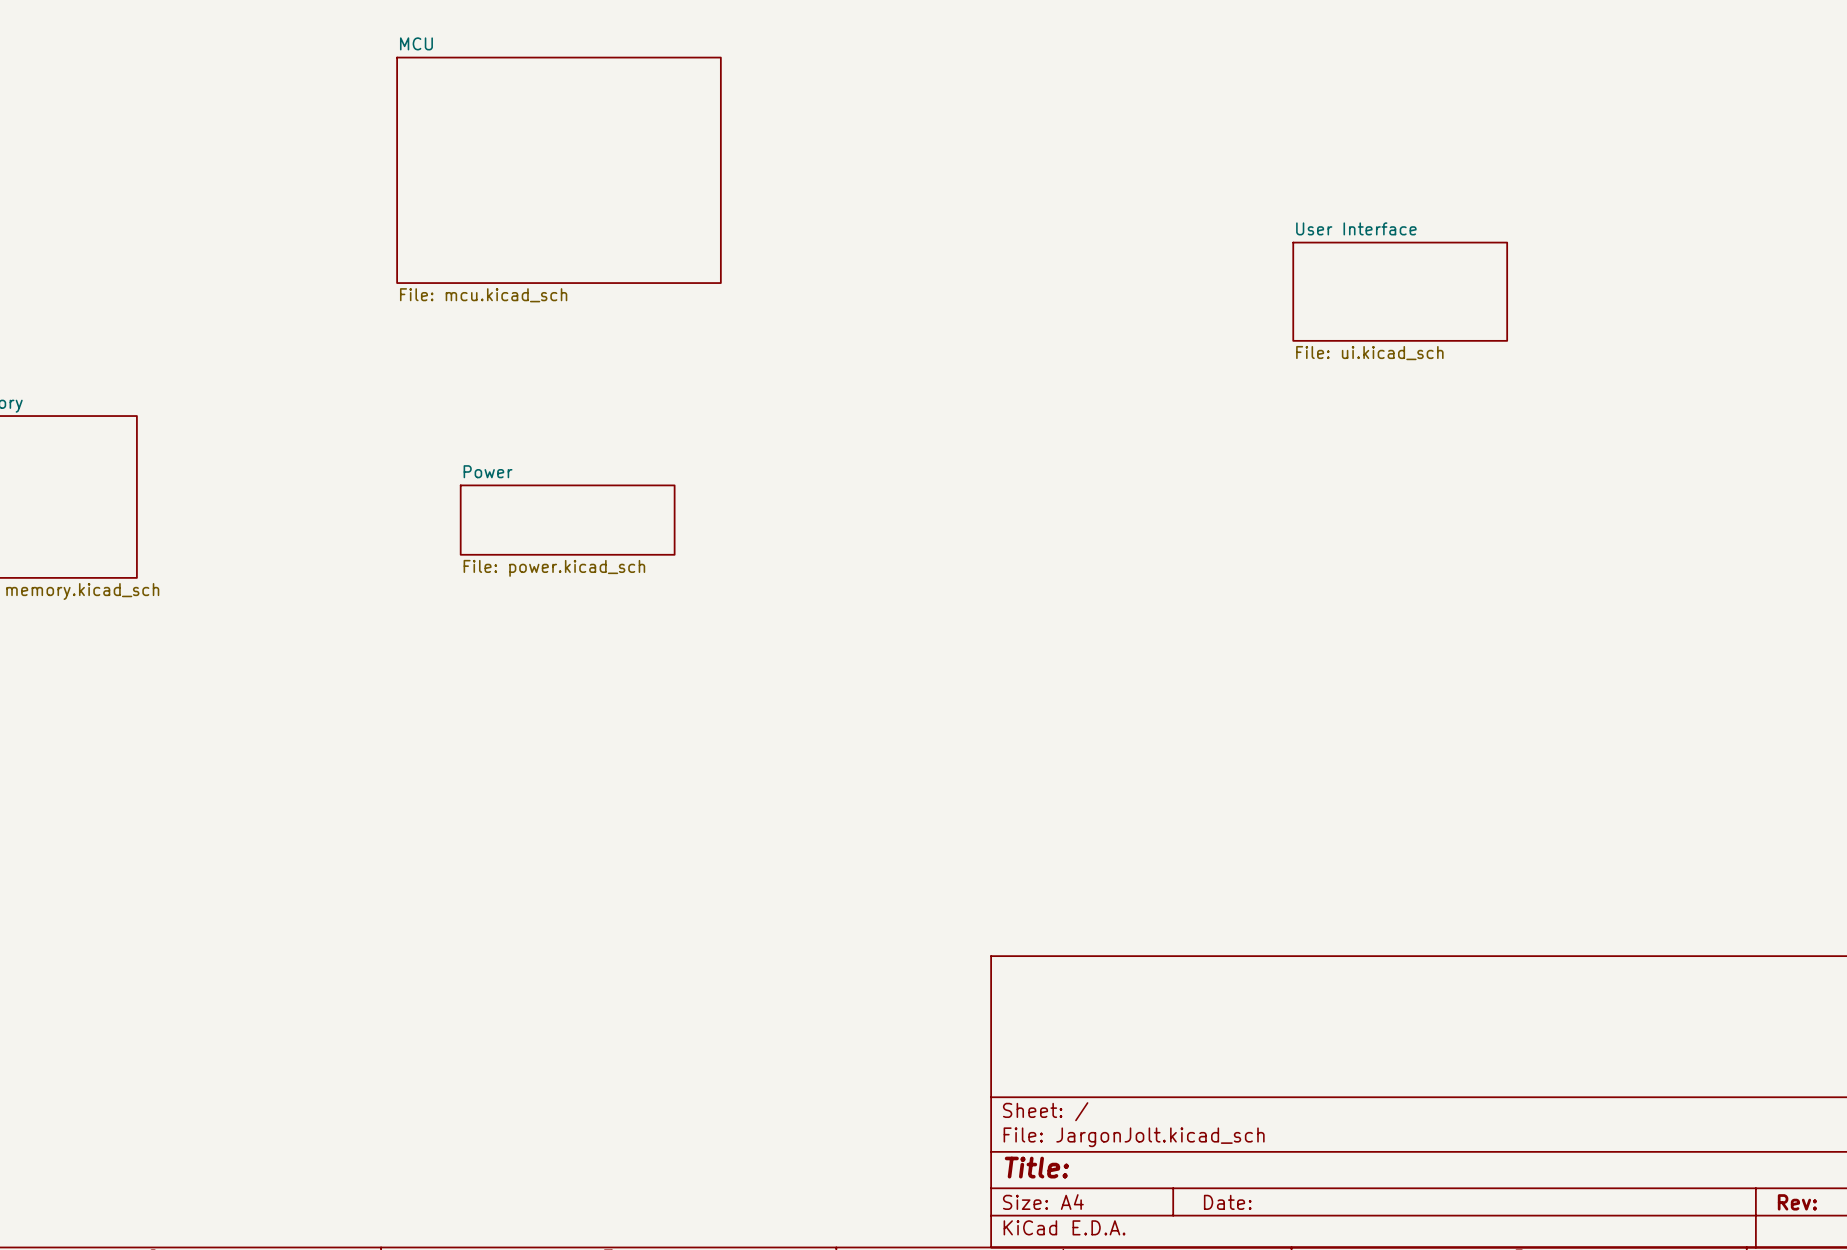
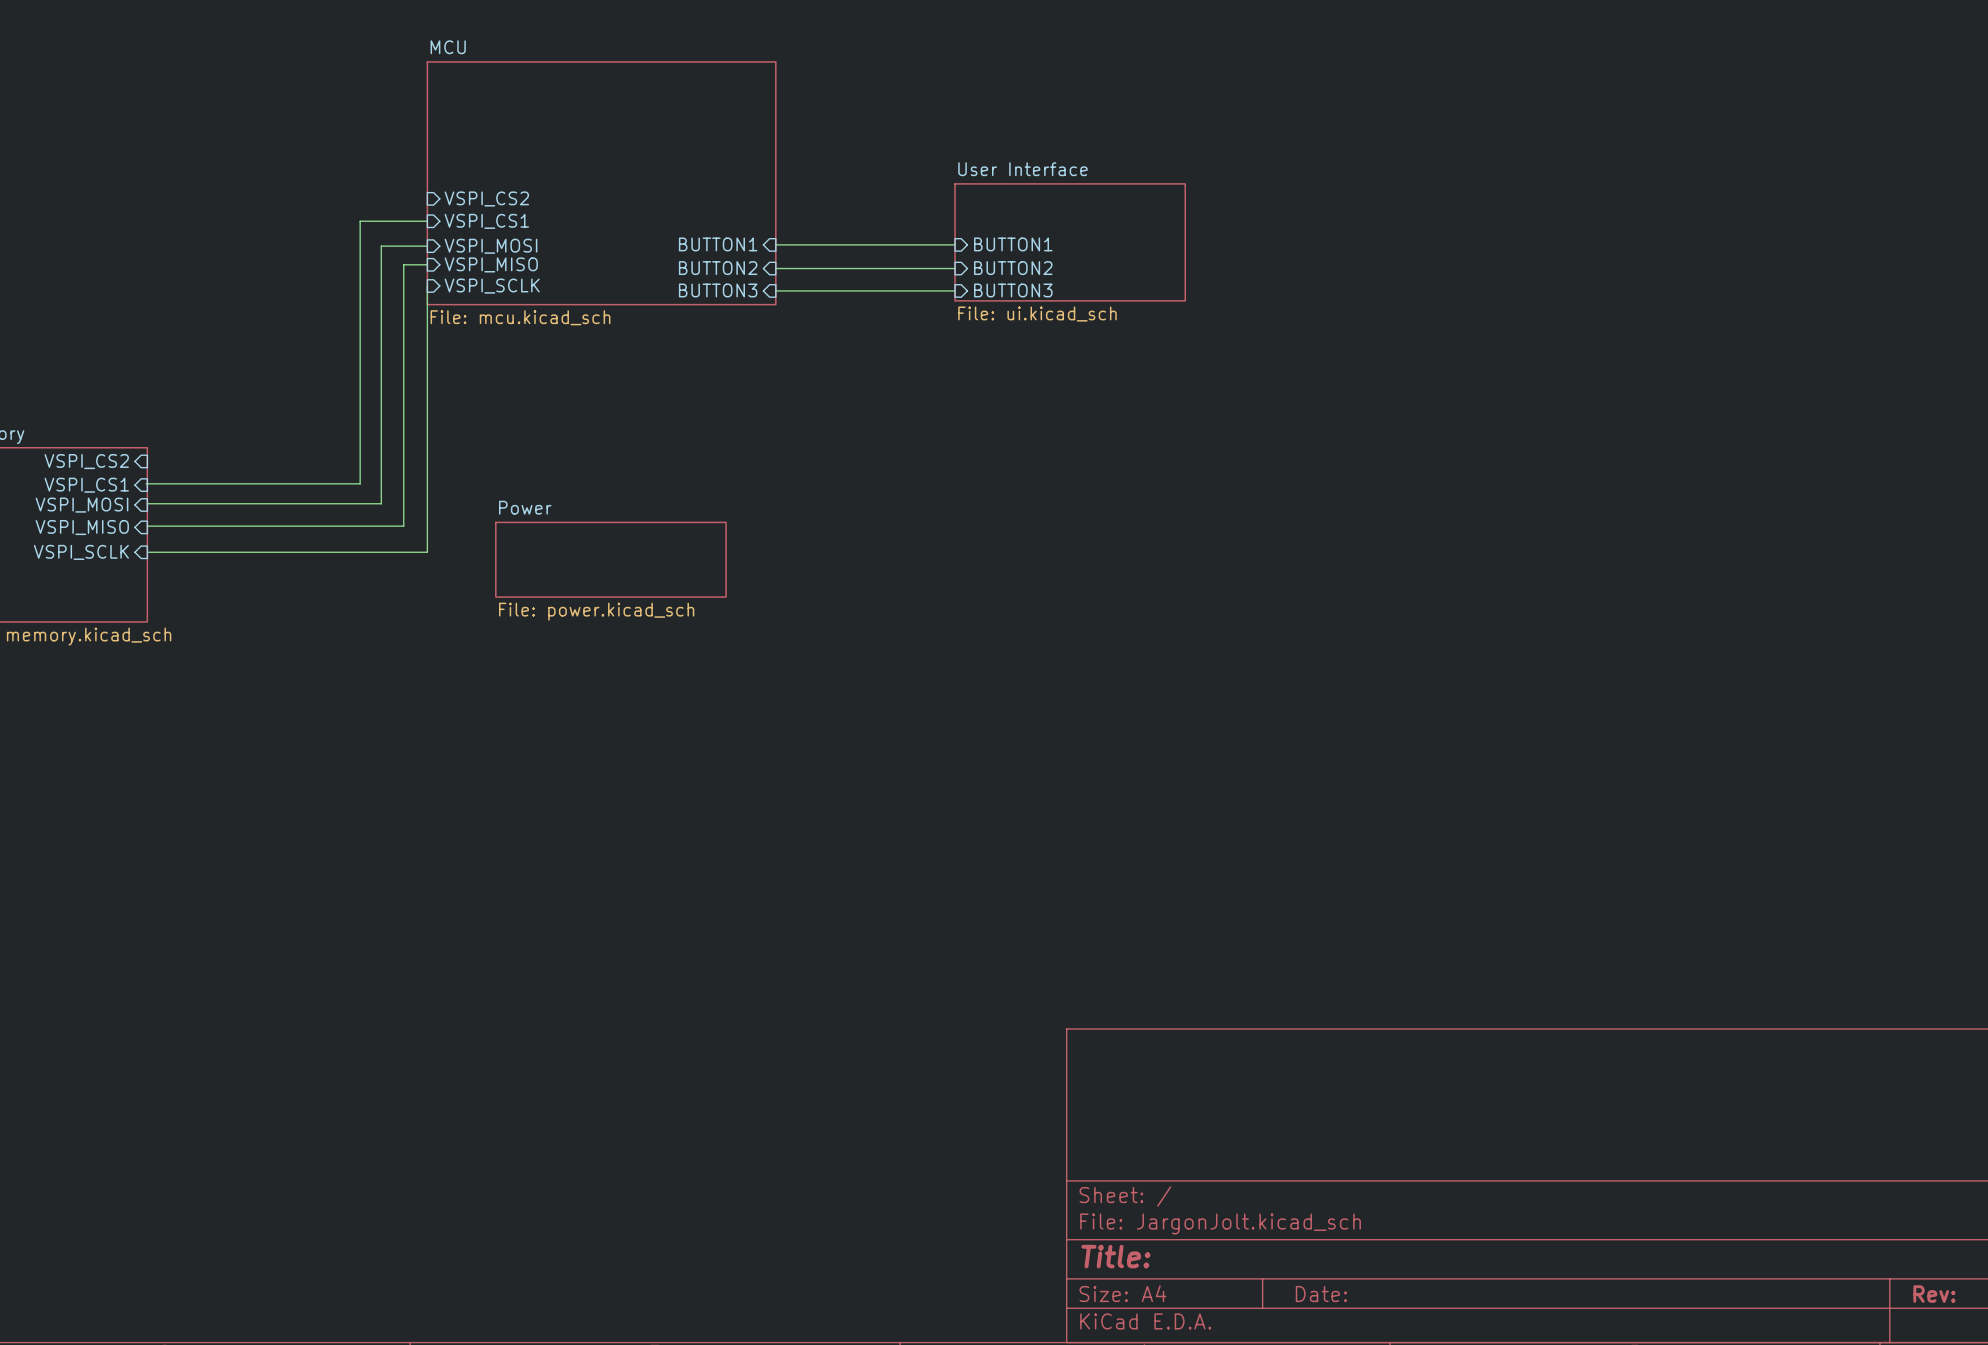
sheet pin: none -> VSPI_CS2 (486, 198)
wire: none -> (427, 221) (360, 221) (360, 483) (146, 483)
sheet pin: none -> VSPI_CS1 (486, 221)
sheet User Interface: none -> File: ui.kicad_sch (1070, 242)
sheet pin: none -> BUTTON1 (718, 244)
wire: none -> (775, 244) (955, 244)
sheet pin: none -> BUTTON1 (1013, 244)
wire: none -> (427, 246) (381, 246) (381, 503) (147, 503)
sheet pin: none -> VSPI_MOSI (490, 246)
wire: none -> (427, 264) (403, 264) (403, 526) (147, 526)
sheet pin: none -> VSPI_MISO (491, 264)
sheet pin: none -> BUTTON2 (718, 268)
wire: none -> (775, 268) (955, 268)
sheet pin: none -> BUTTON2 (1013, 268)
wire: none -> (427, 285) (427, 552) (148, 552)
sheet pin: none -> VSPI_SCLK (492, 286)
sheet pin: none -> BUTTON3 (718, 290)
sheet pin: none -> BUTTON3 (1013, 290)
wire: none -> (775, 290) (955, 290)
sheet User Interface: File: ui.kicad_sch (1400, 291) -> none
sheet pin: none -> VSPI_CS2 (86, 461)
sheet pin: none -> VSPI_CS1 (86, 485)
sheet pin: none -> VSPI_MOSI (81, 505)
sheet pin: none -> VSPI_MISO (82, 527)
sheet pin: none -> VSPI_SCLK (81, 552)

